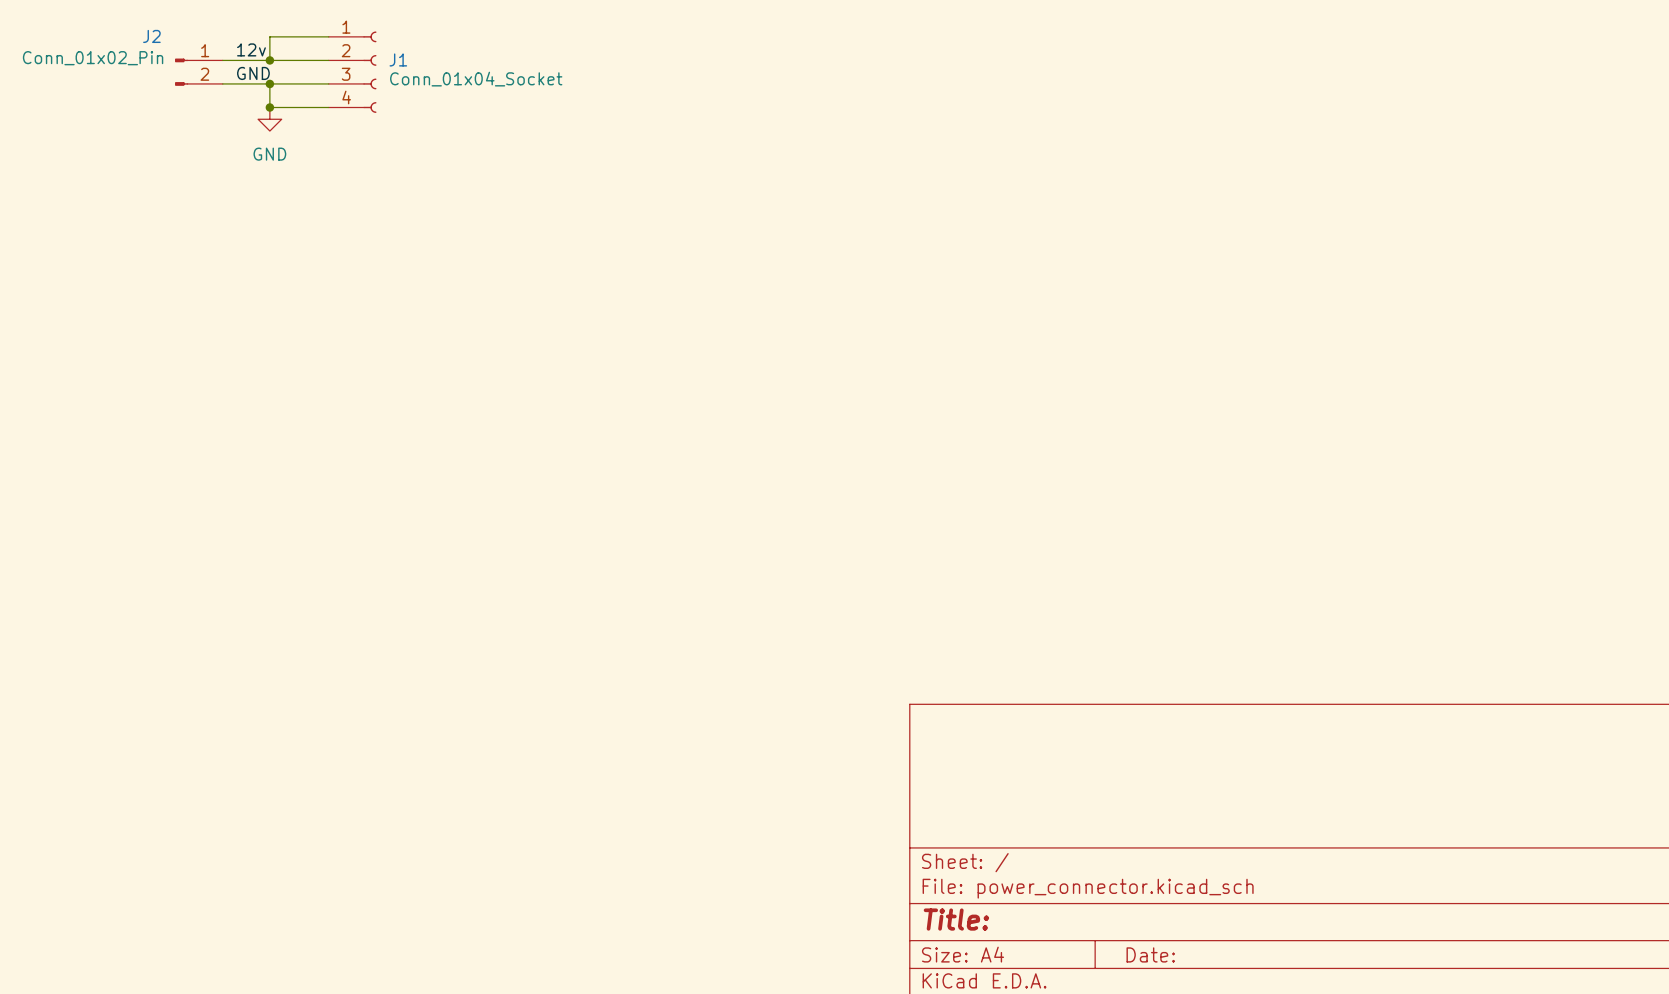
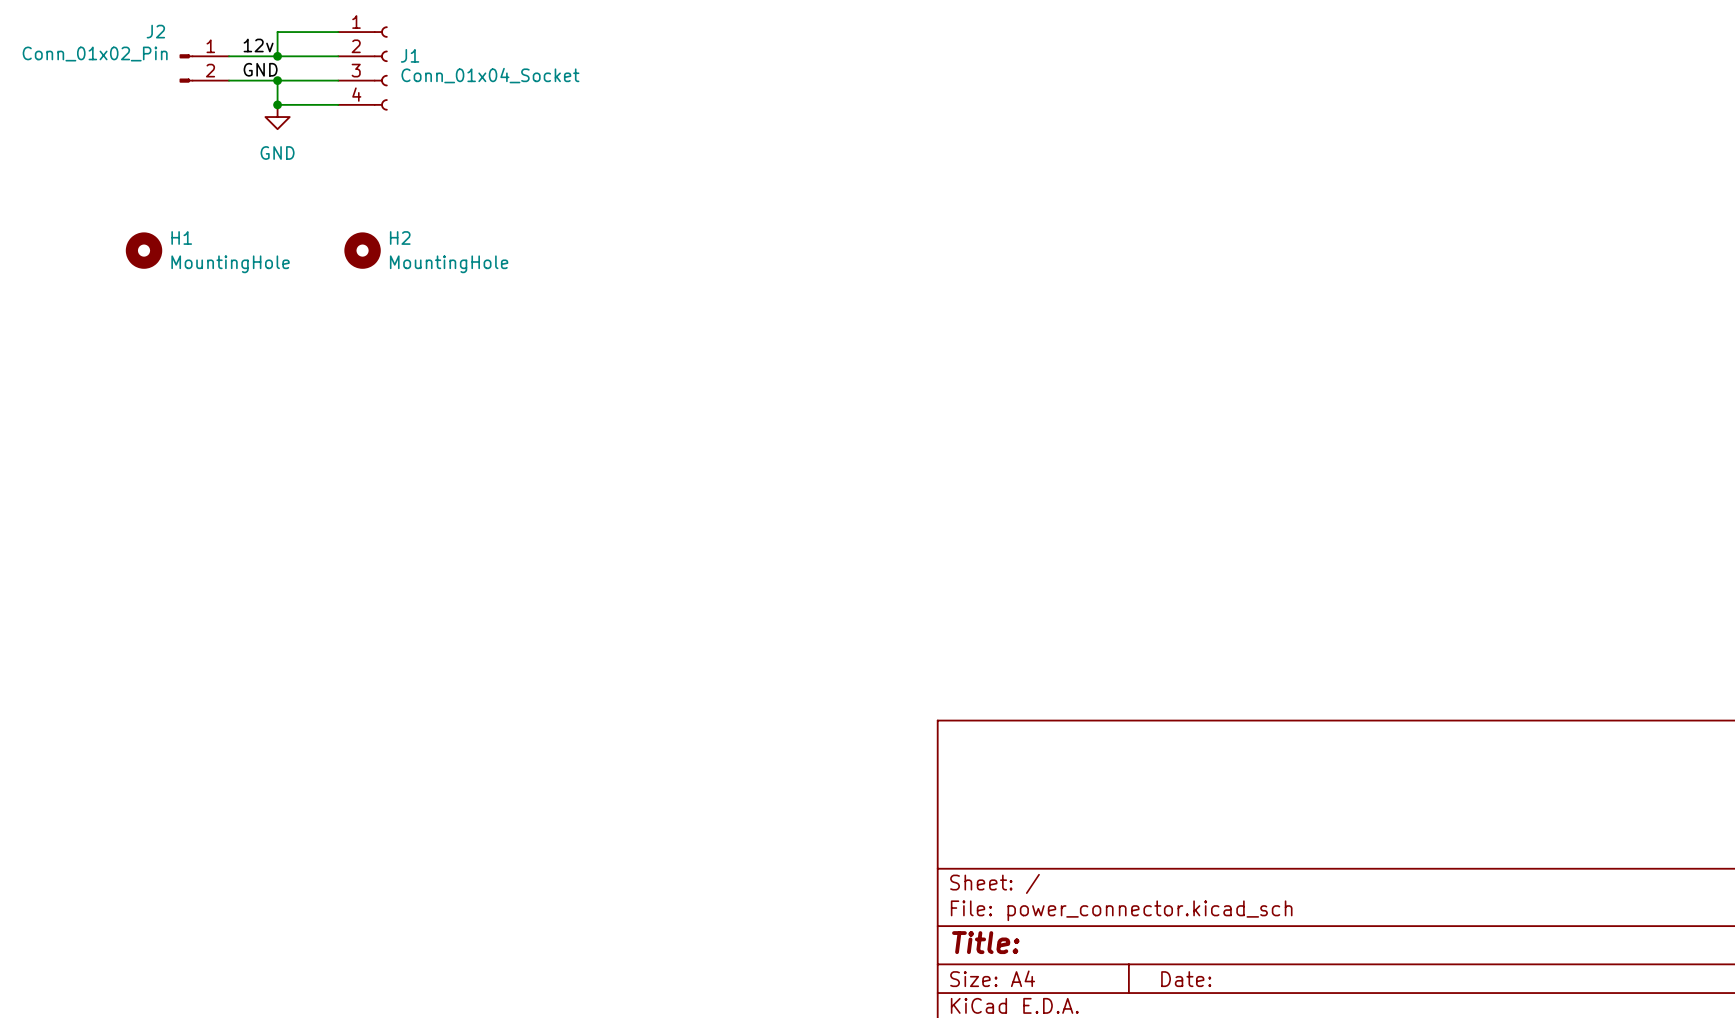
H1: none -> MountingHole (144, 250)
H2: none -> MountingHole (362, 250)

